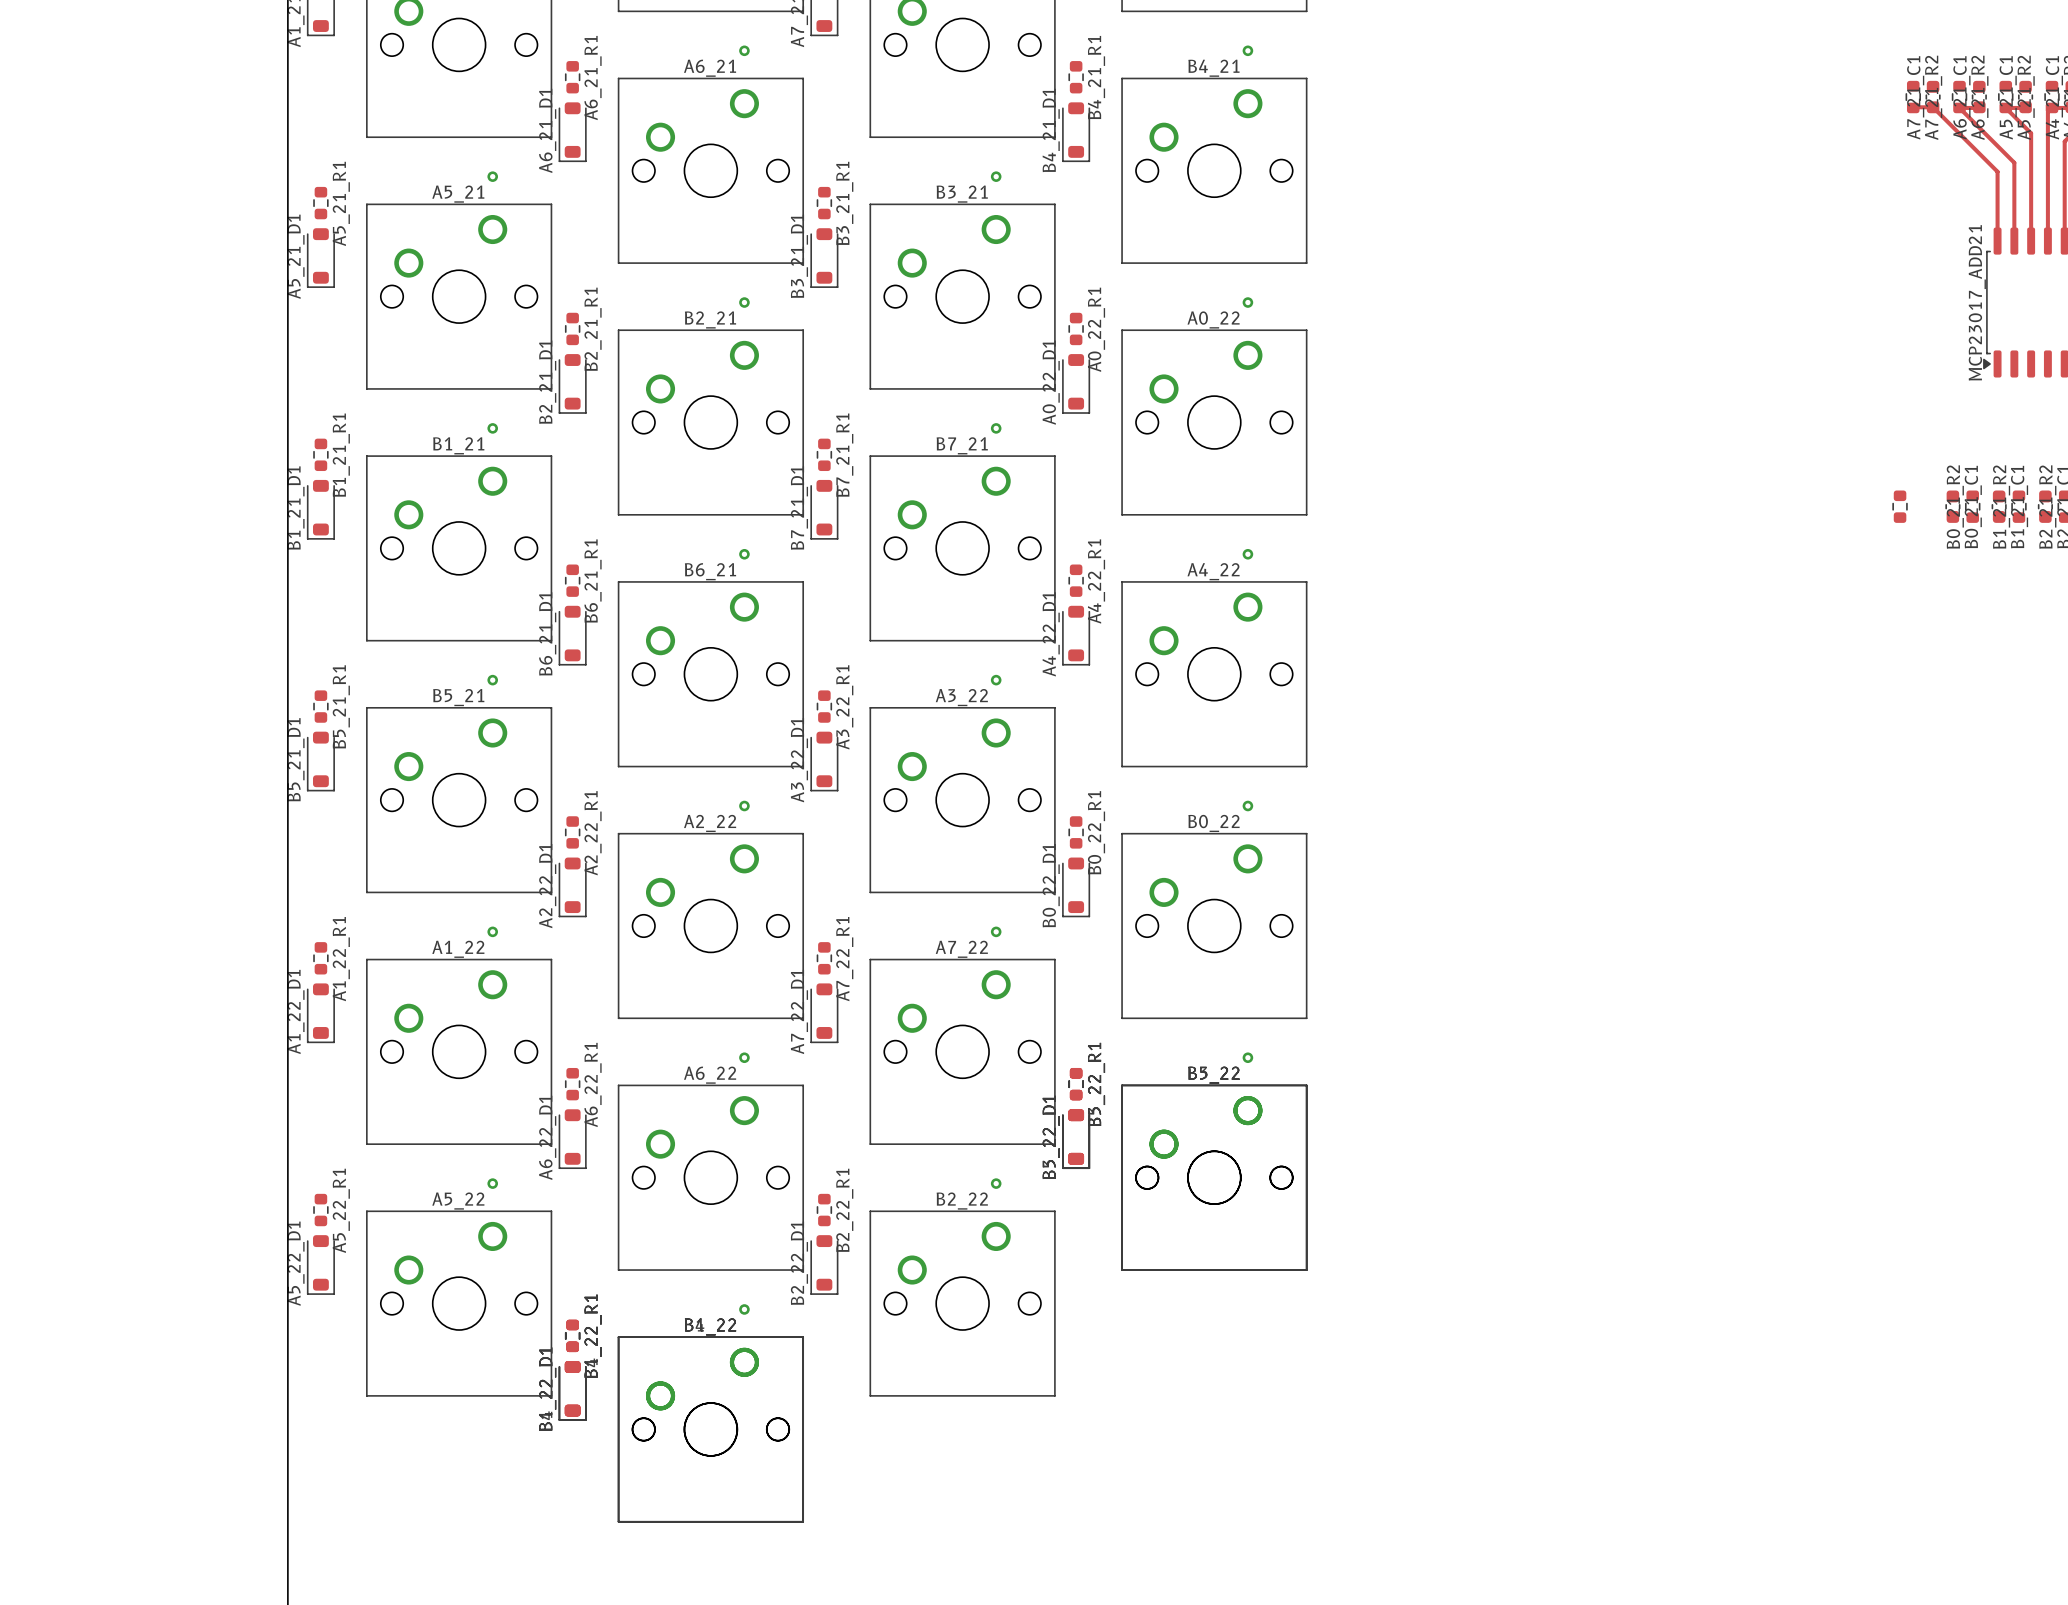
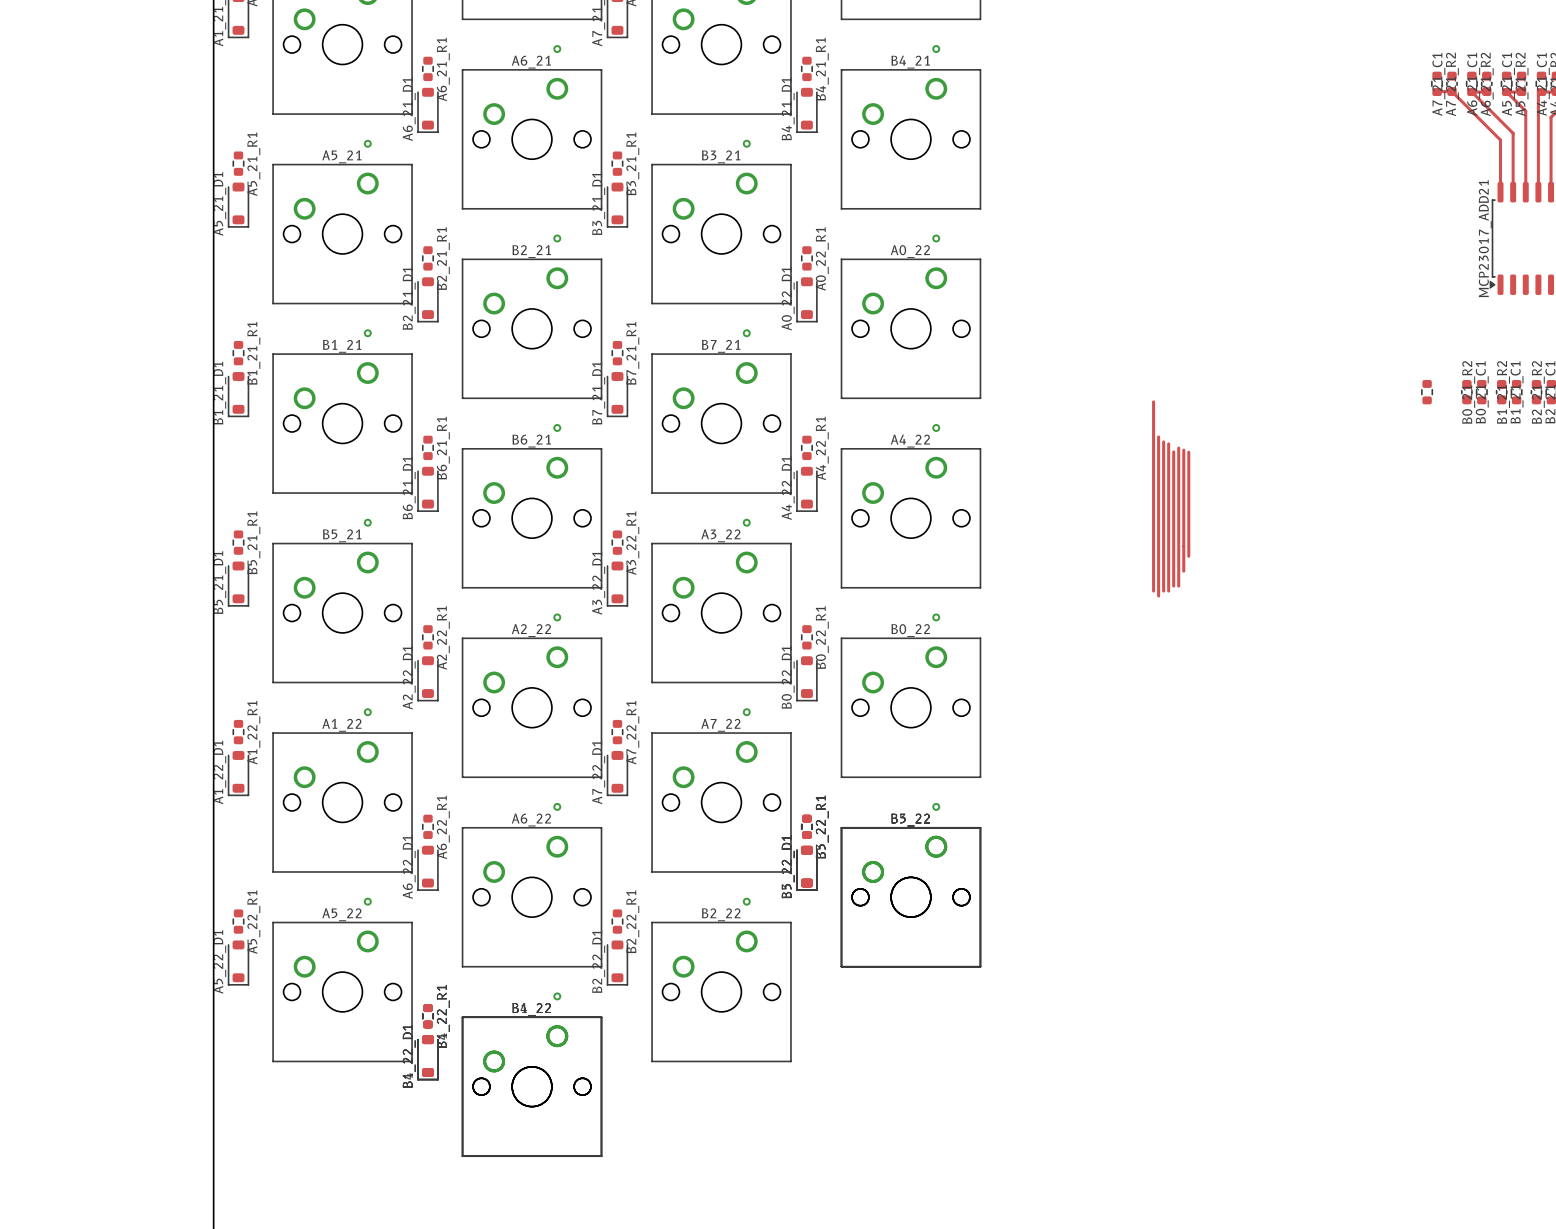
top track: none -> (1153, 401) (1153, 591)
top track: none -> (1158, 436) (1158, 596)
top track: none -> (1163, 441) (1163, 591)
top track: none -> (1168, 443) (1168, 591)
top track: none -> (1178, 448) (1178, 586)
top track: none -> (1183, 450) (1183, 571)
top track: none -> (1173, 451) (1173, 586)
top track: none -> (1188, 452) (1188, 556)

